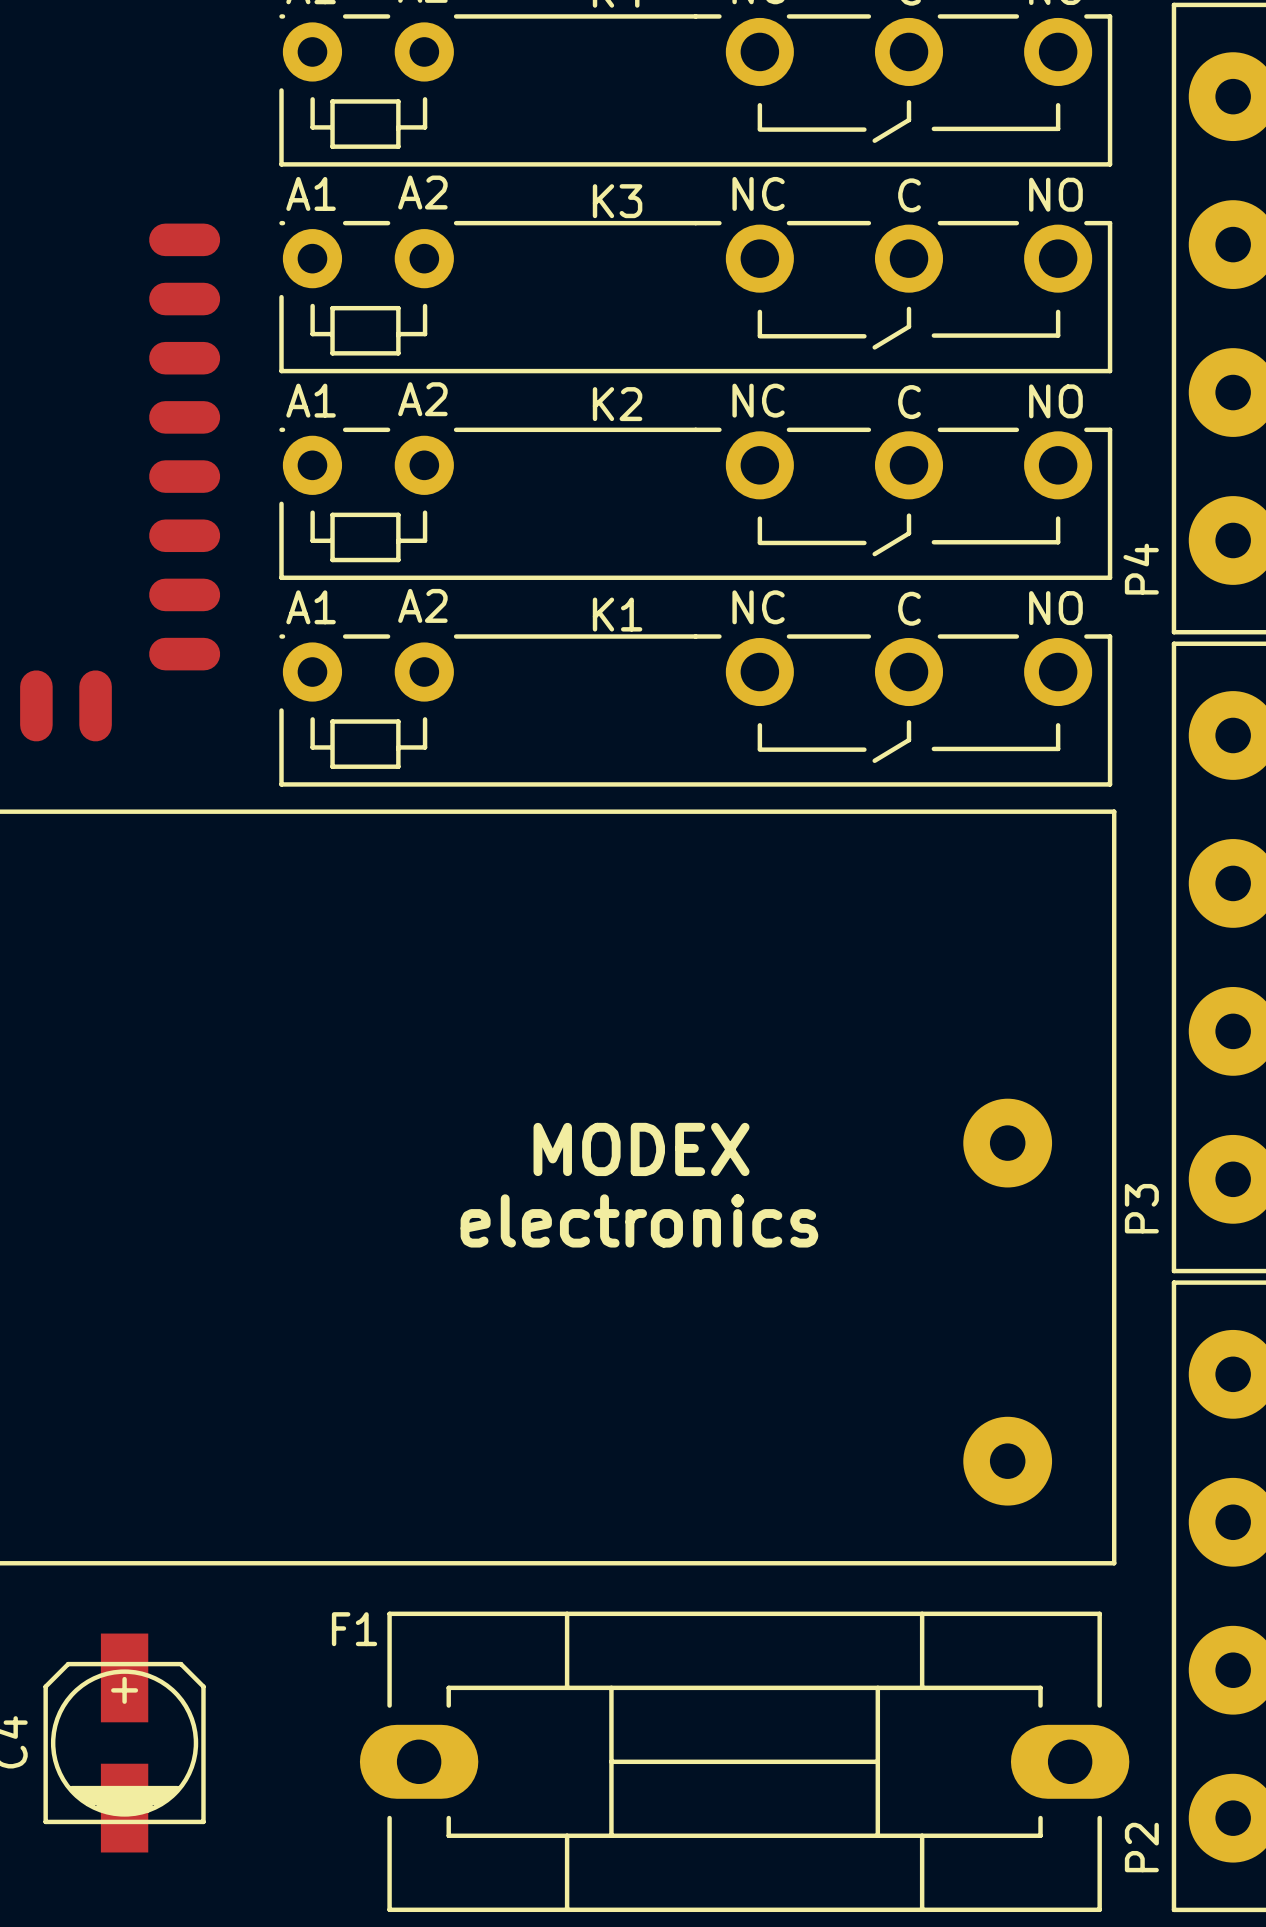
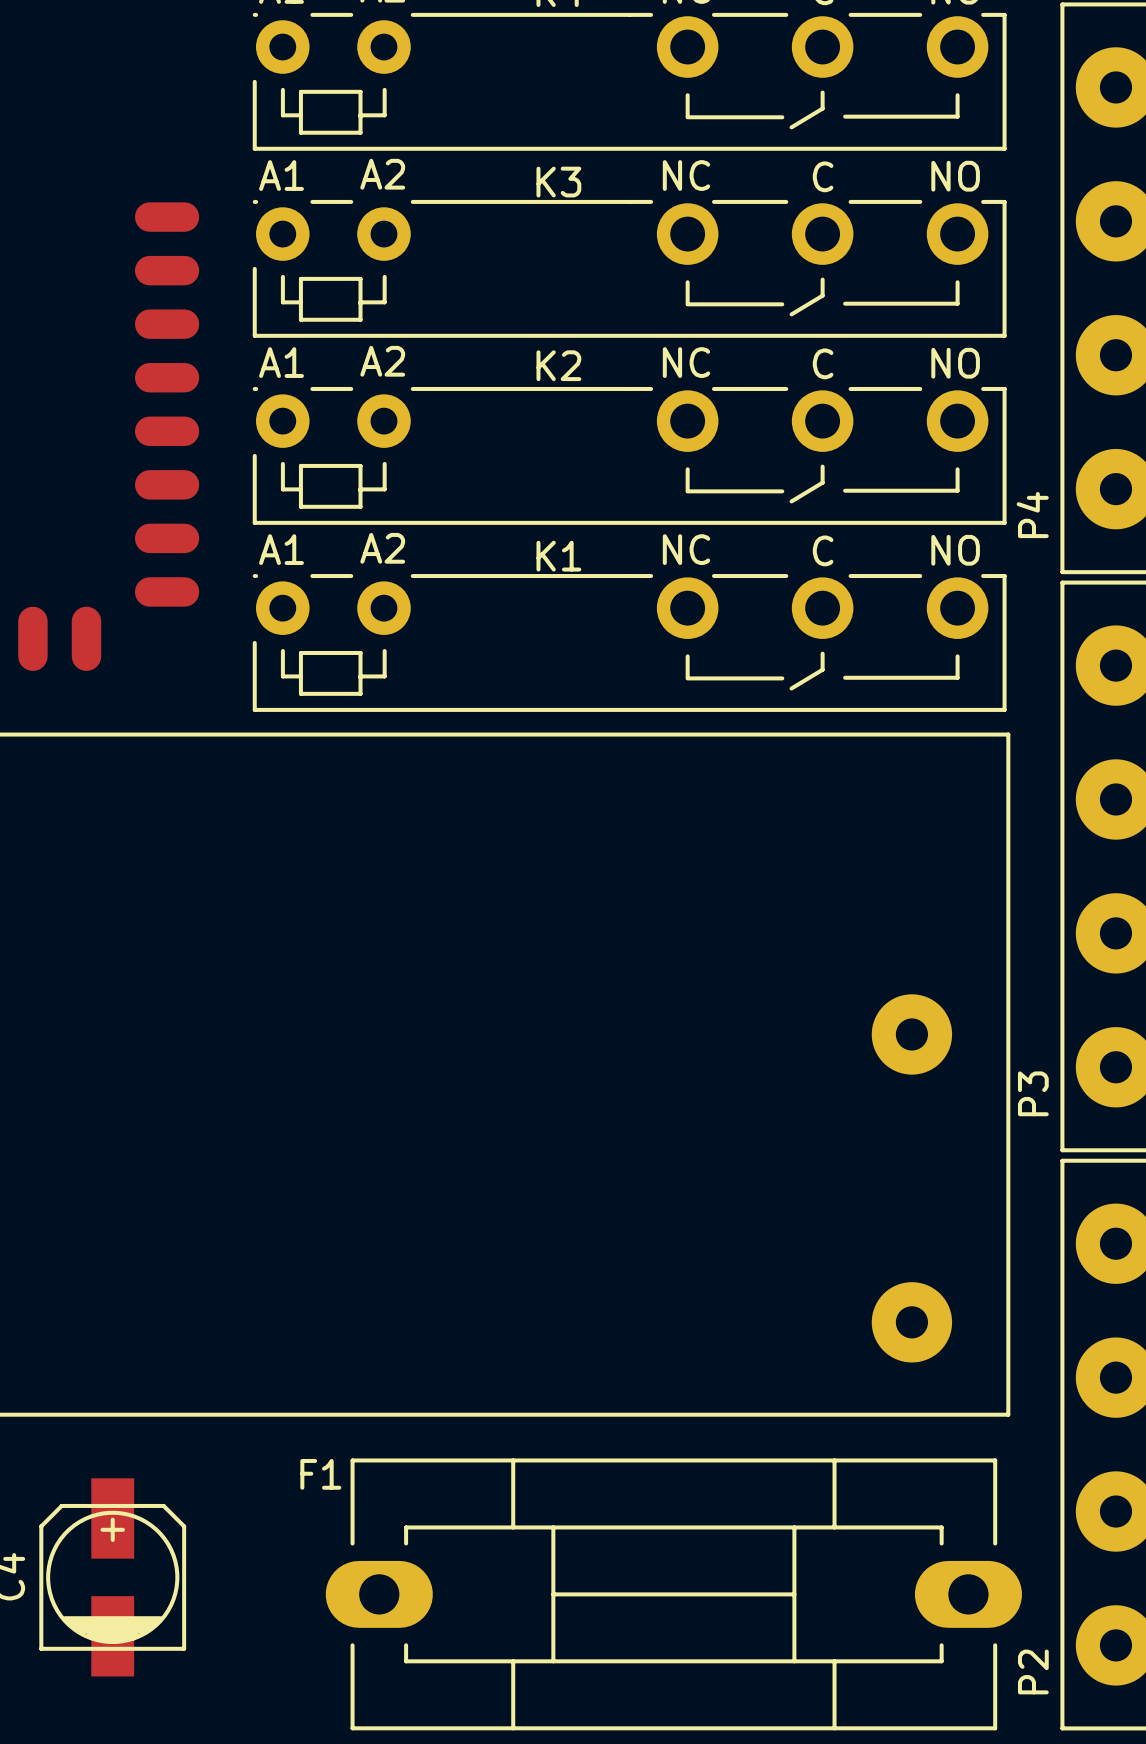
text: MODEX (641, 1149) -> none
text: electronics (639, 1220) -> none

